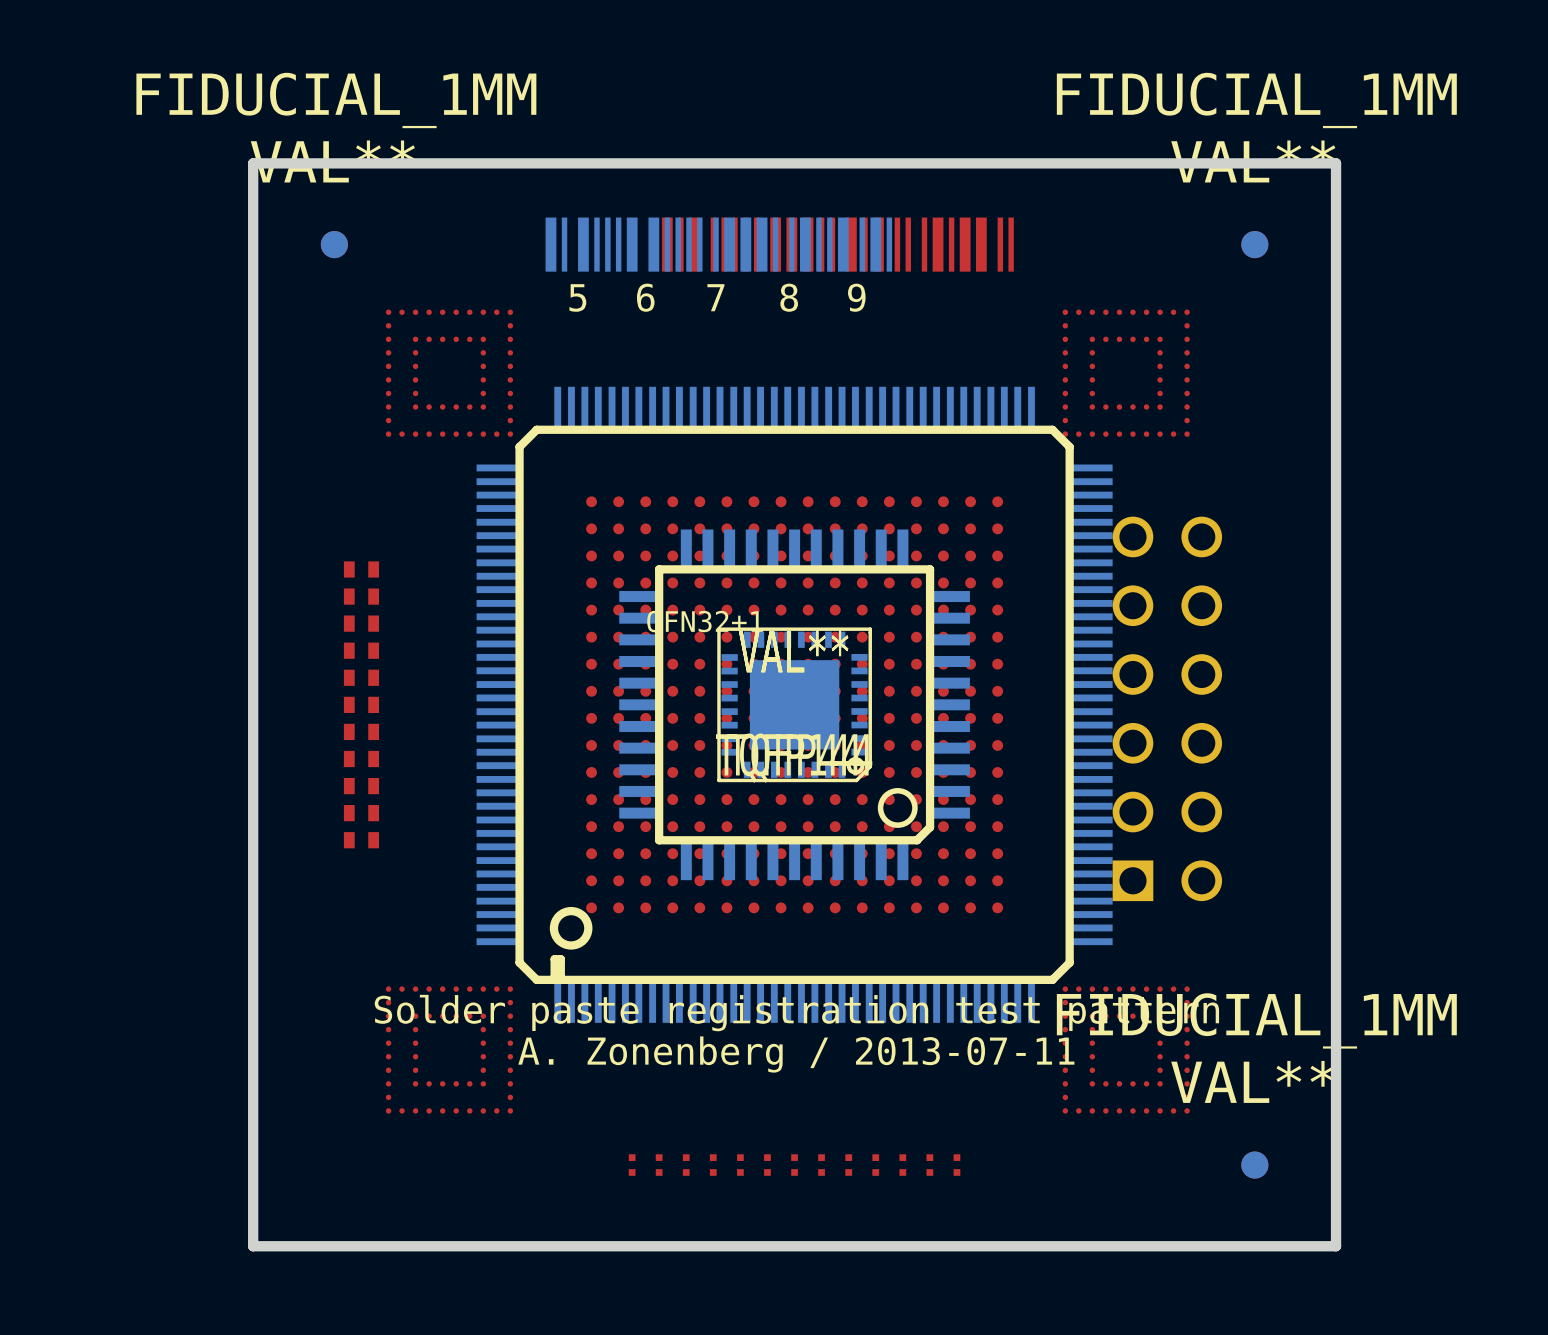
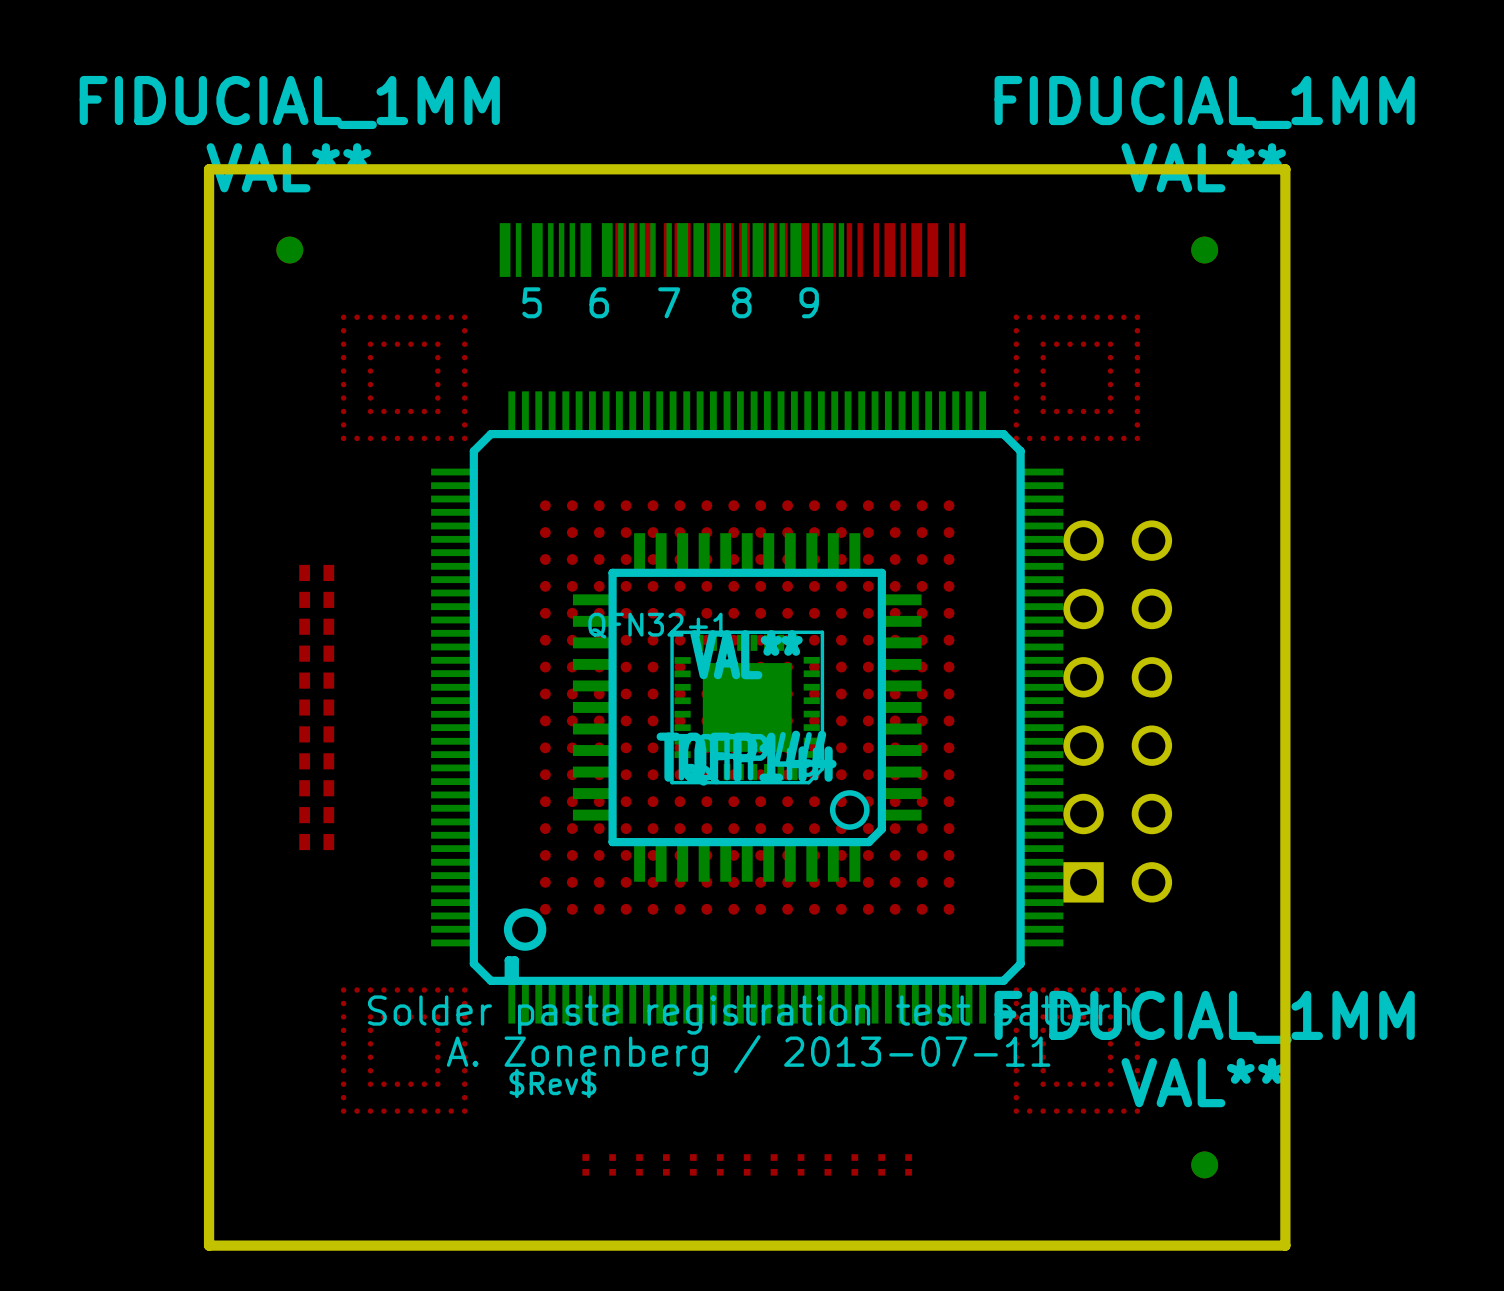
text: none -> $Rev$ (552, 1083)

